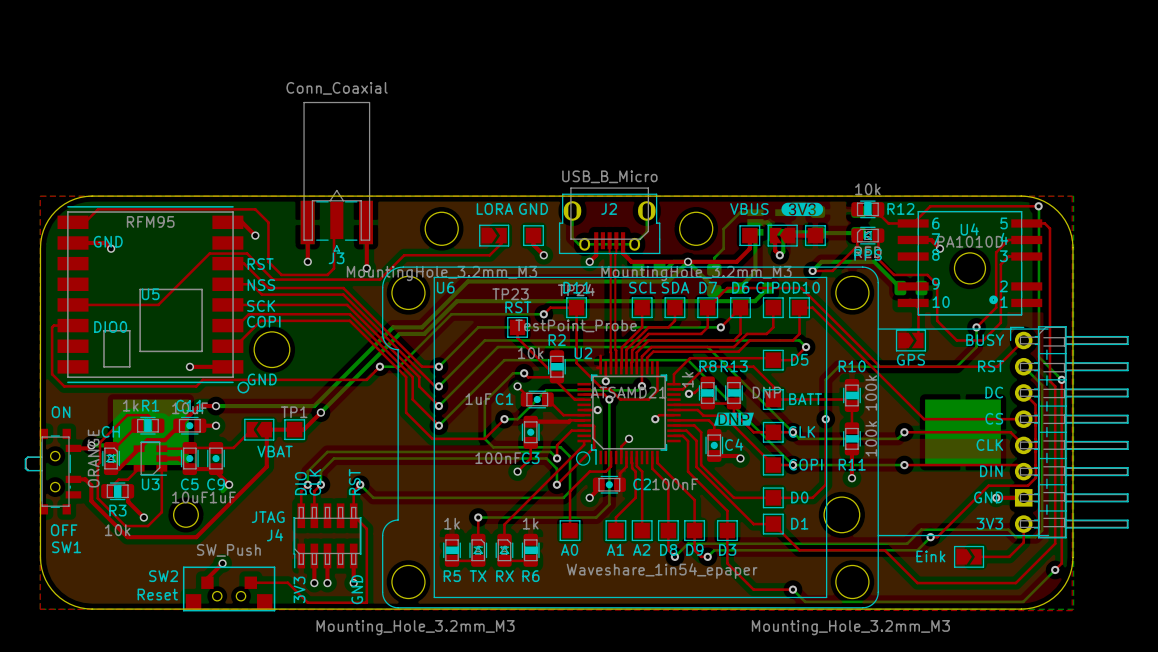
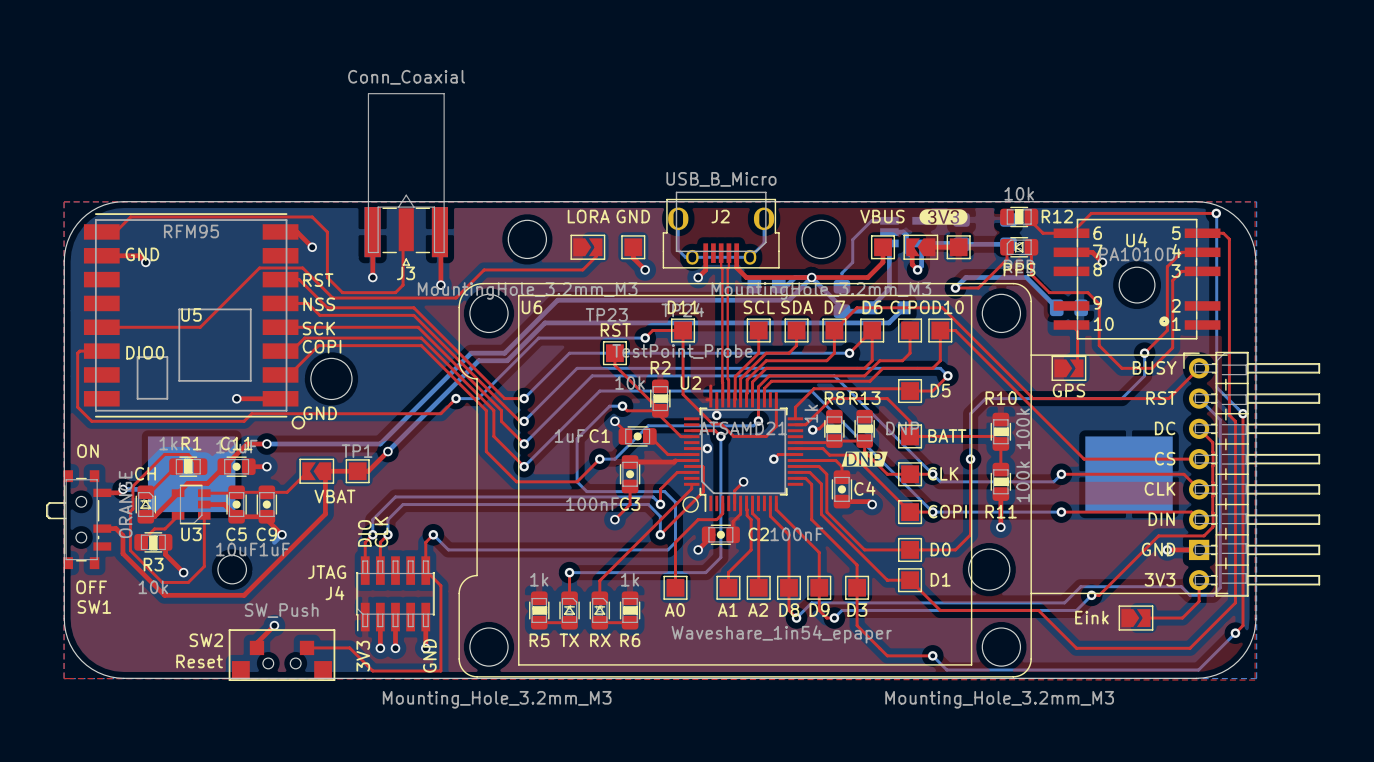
text: RST (354, 482) -> none

